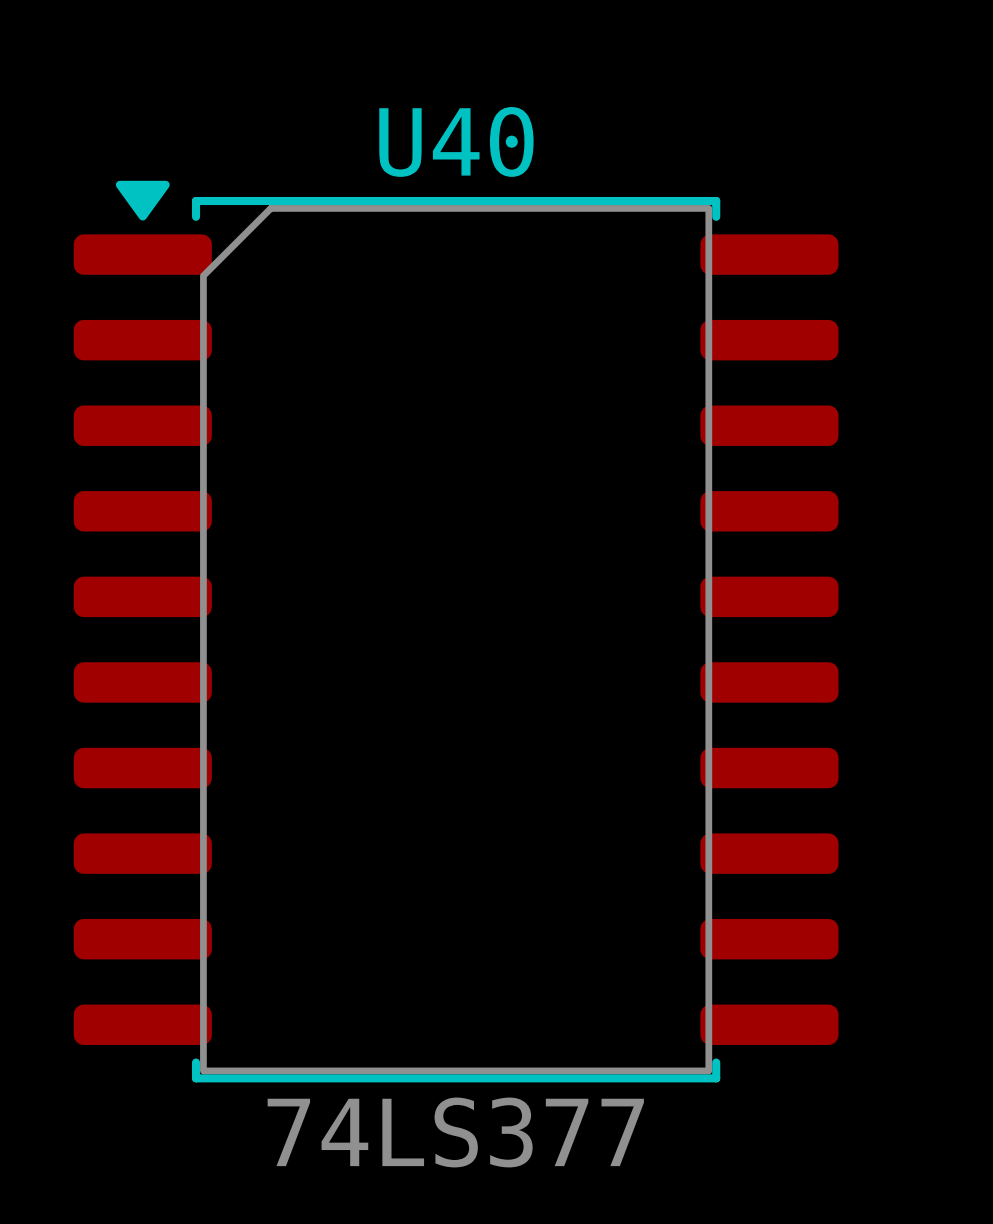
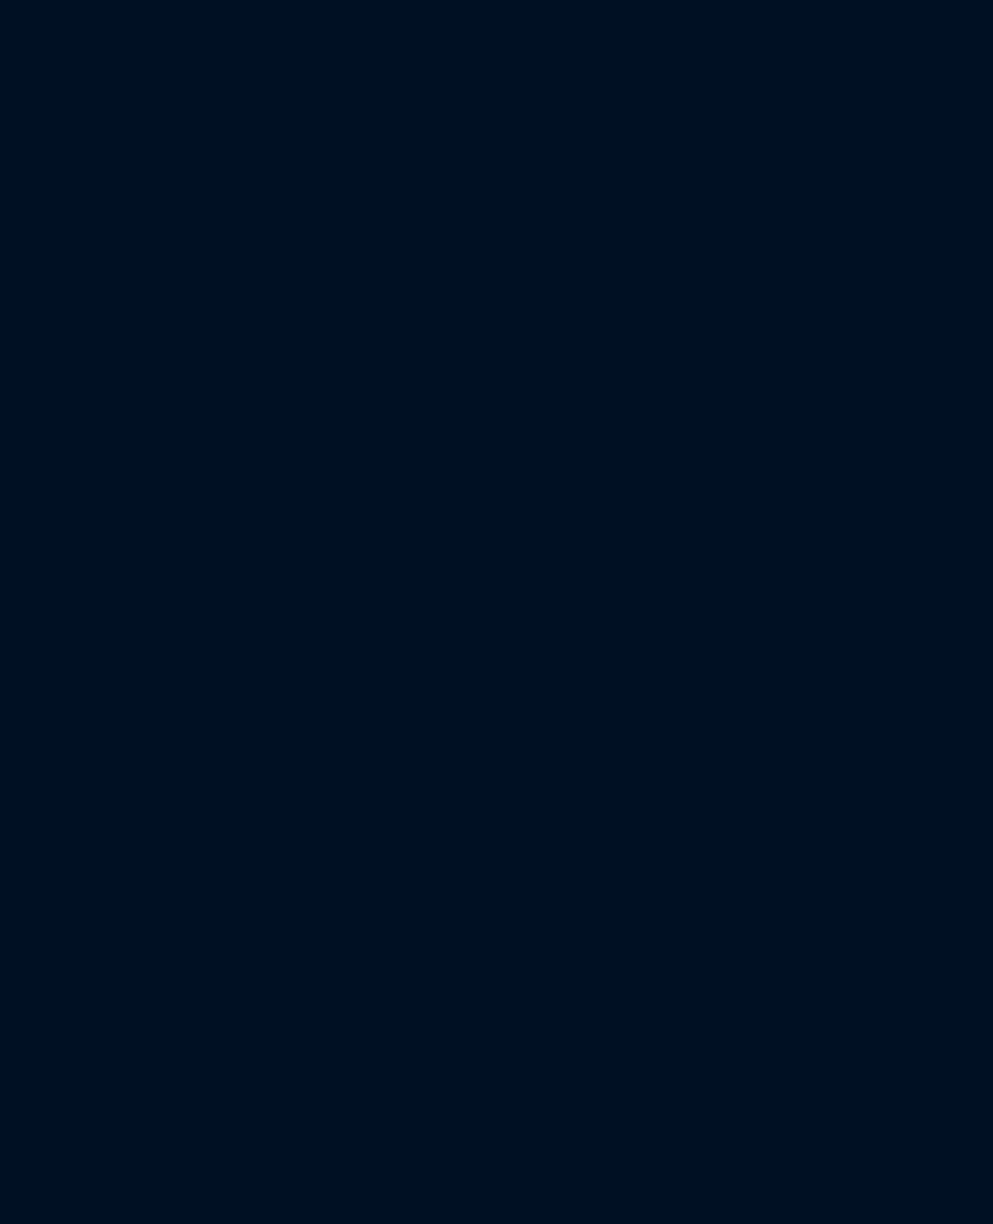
U40: 74LS377 (456, 631) -> none

